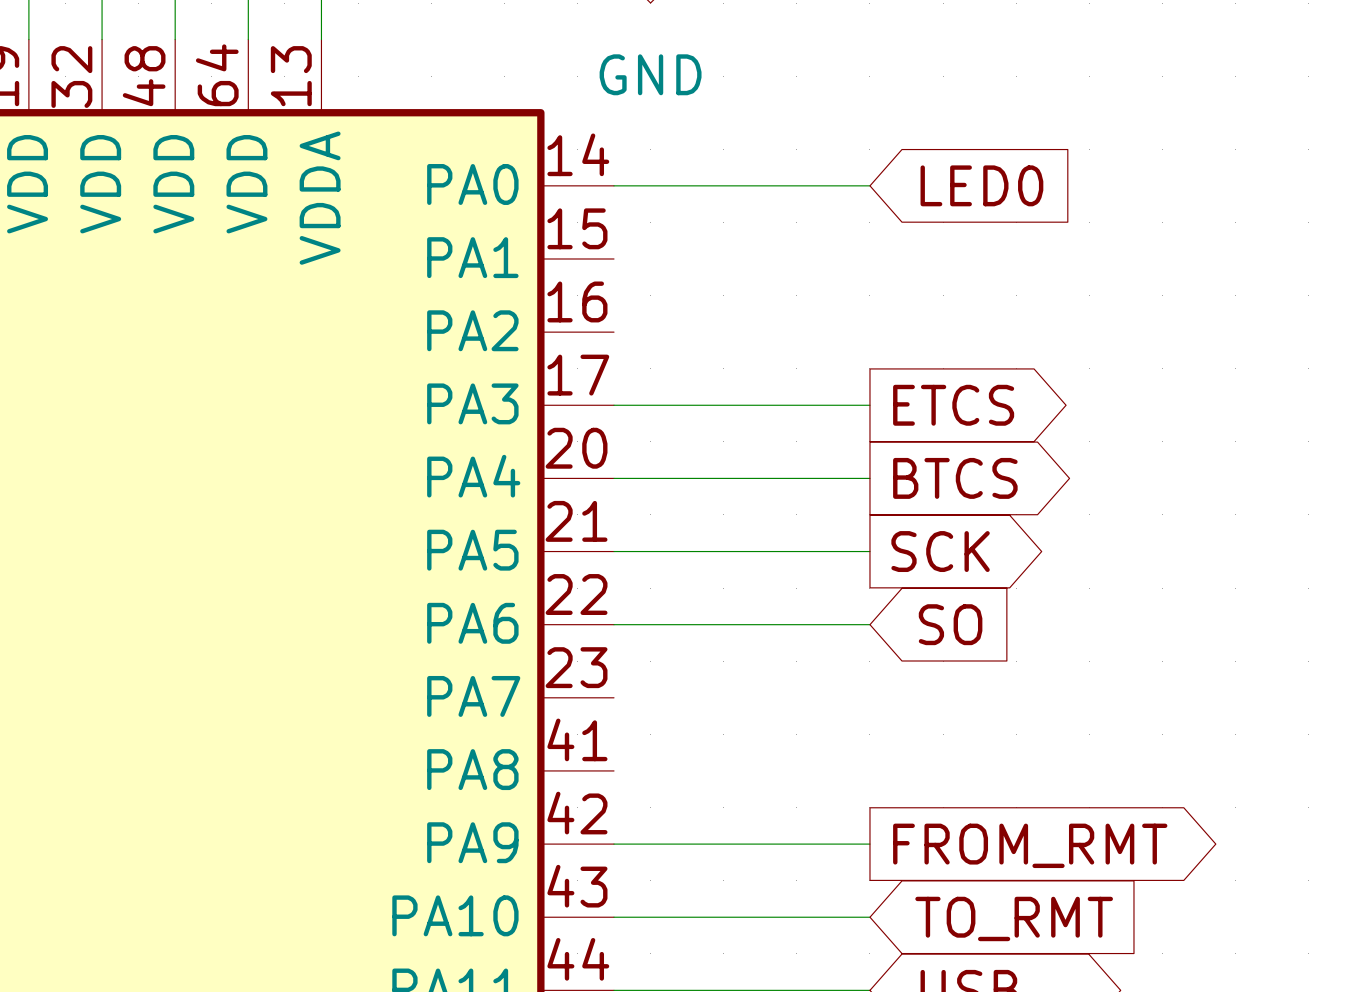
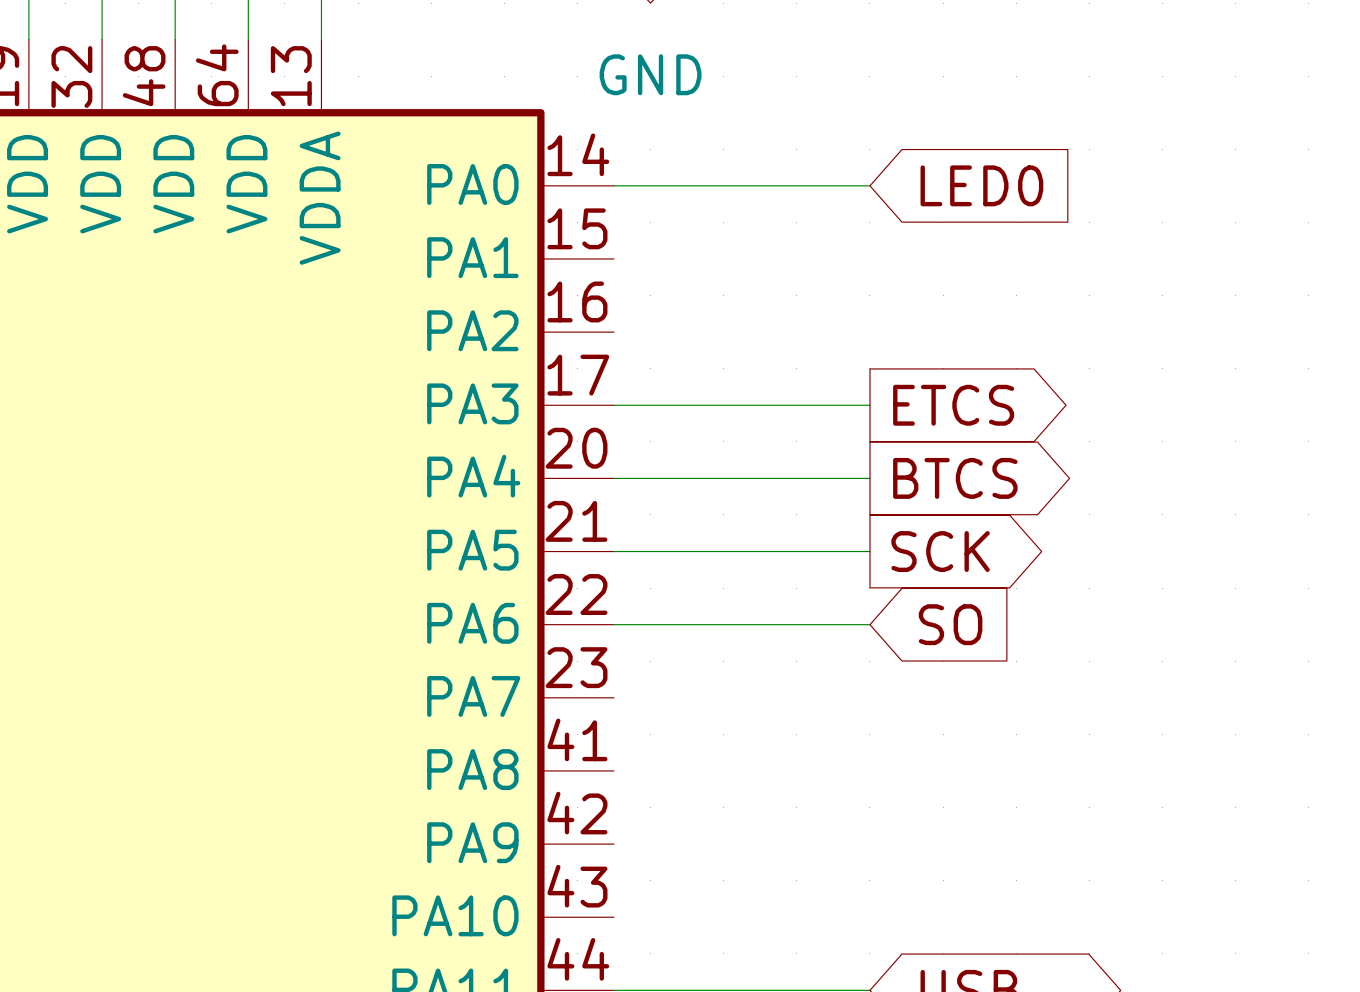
wire: (614, 844) (869, 844) -> none
global label: FROM_RMT (1030, 845) -> none
wire: (614, 917) (869, 917) -> none
global label: TO_RMT (1014, 918) -> none

